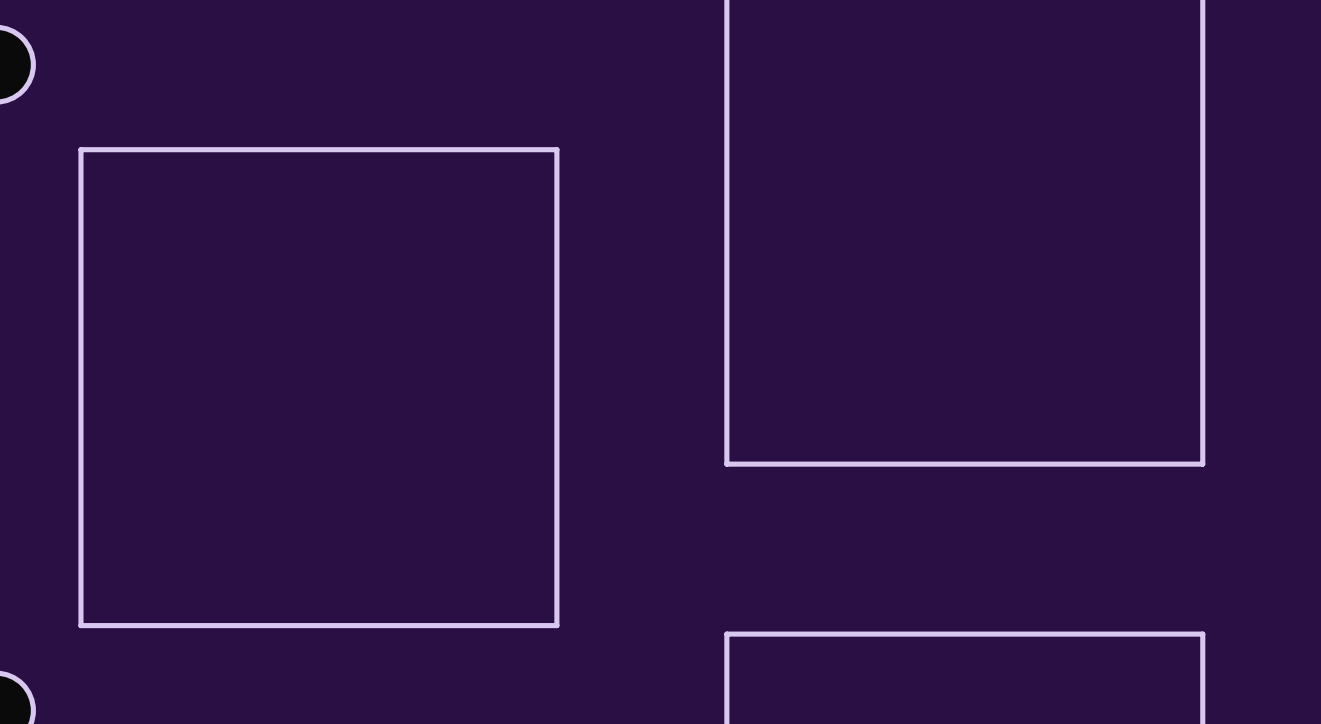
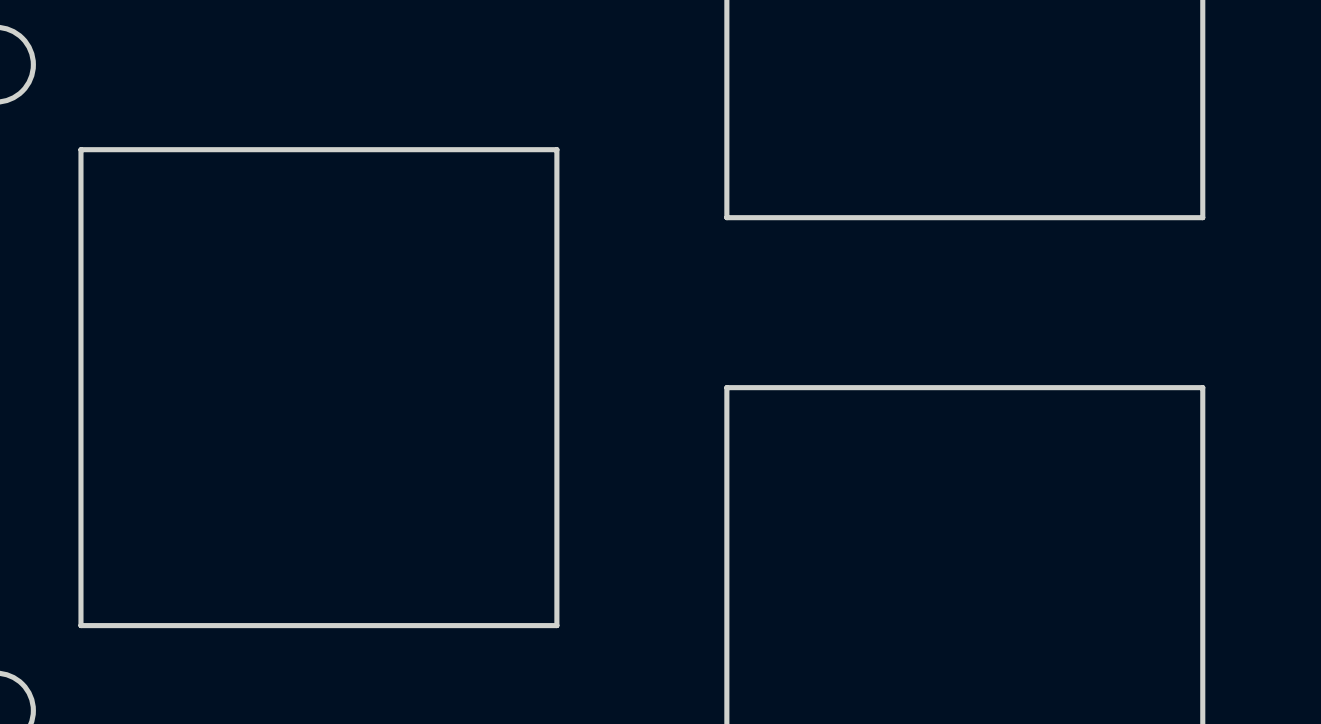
board edge: (726, 217) (726, 387) -> (726, 217) (1202, 217)
board edge: (1202, 217) (1202, 387) -> (726, 387) (1202, 387)
board edge: (726, 464) (1202, 464) -> (726, 464) (726, 634)
board edge: (726, 634) (1202, 634) -> (1202, 464) (1202, 634)

